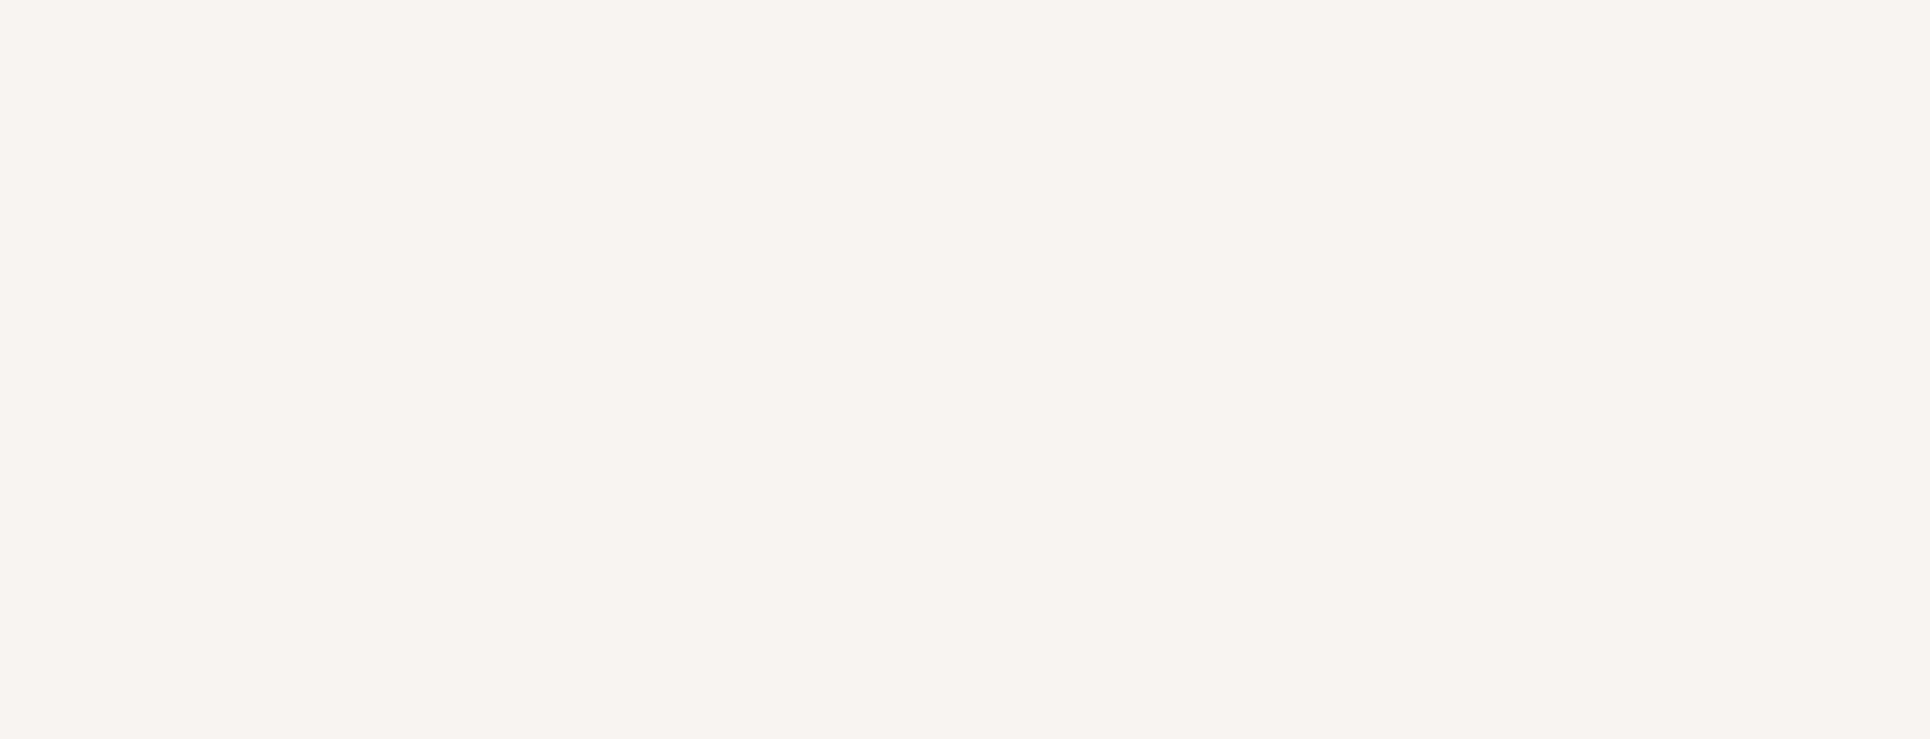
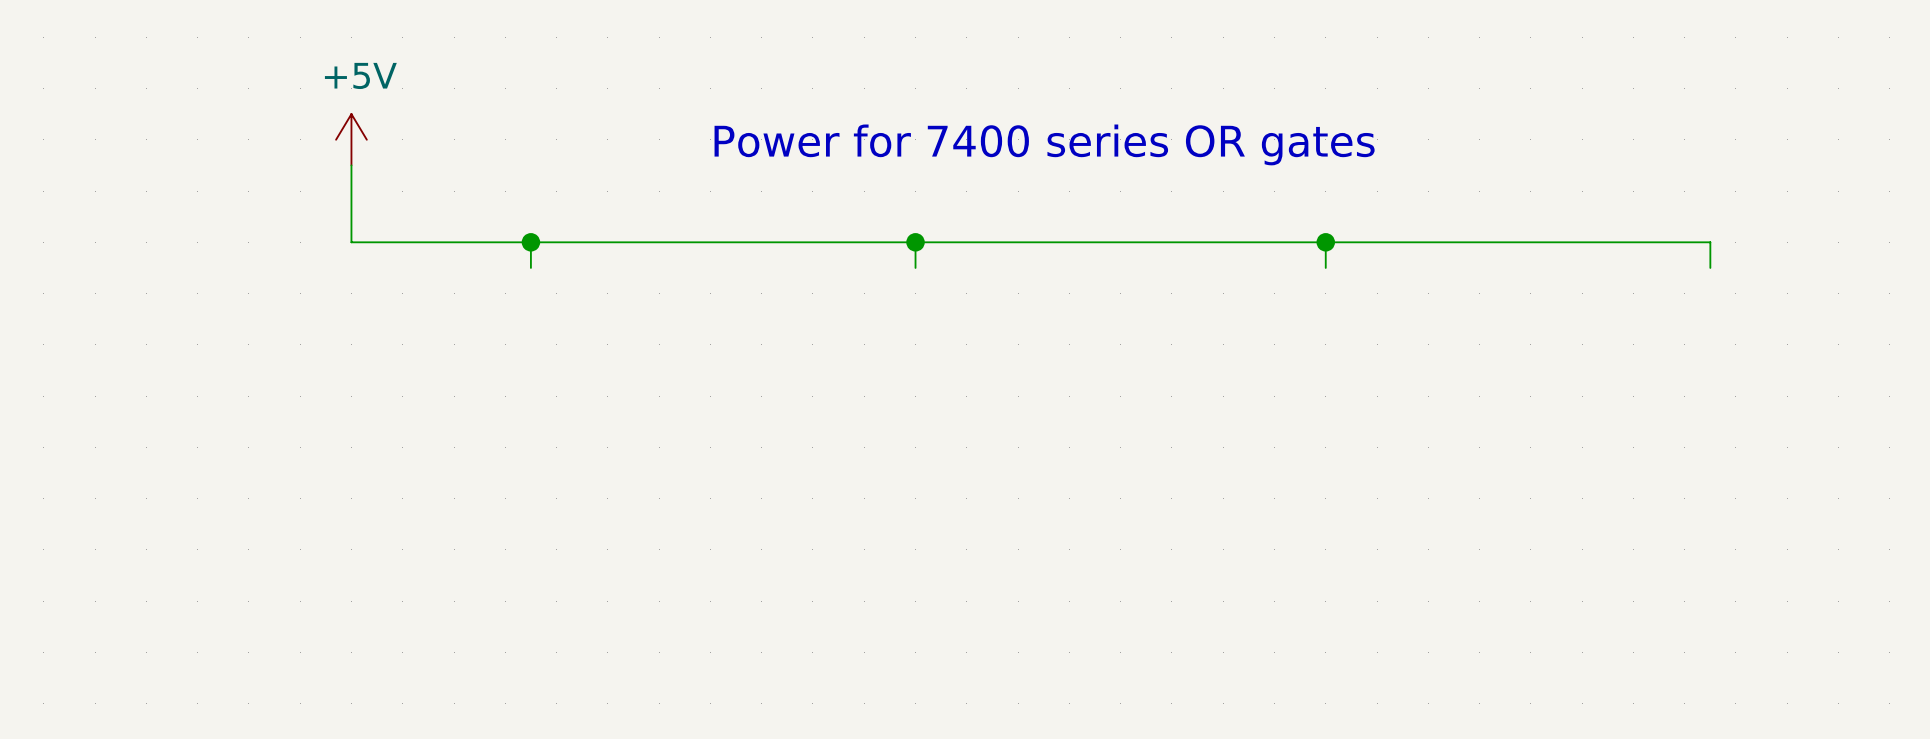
power symbol: none -> +5V (351, 139)
text: none -> Power for 7400 series OR gates (1044, 144)
wire: none -> (351, 165) (351, 242) (1710, 242) (1710, 267)
wire: none -> (530, 242) (530, 267)
junction: none -> (530, 242)
wire: none -> (915, 242) (915, 267)
junction: none -> (915, 242)
wire: none -> (1325, 242) (1325, 267)
junction: none -> (1325, 242)

